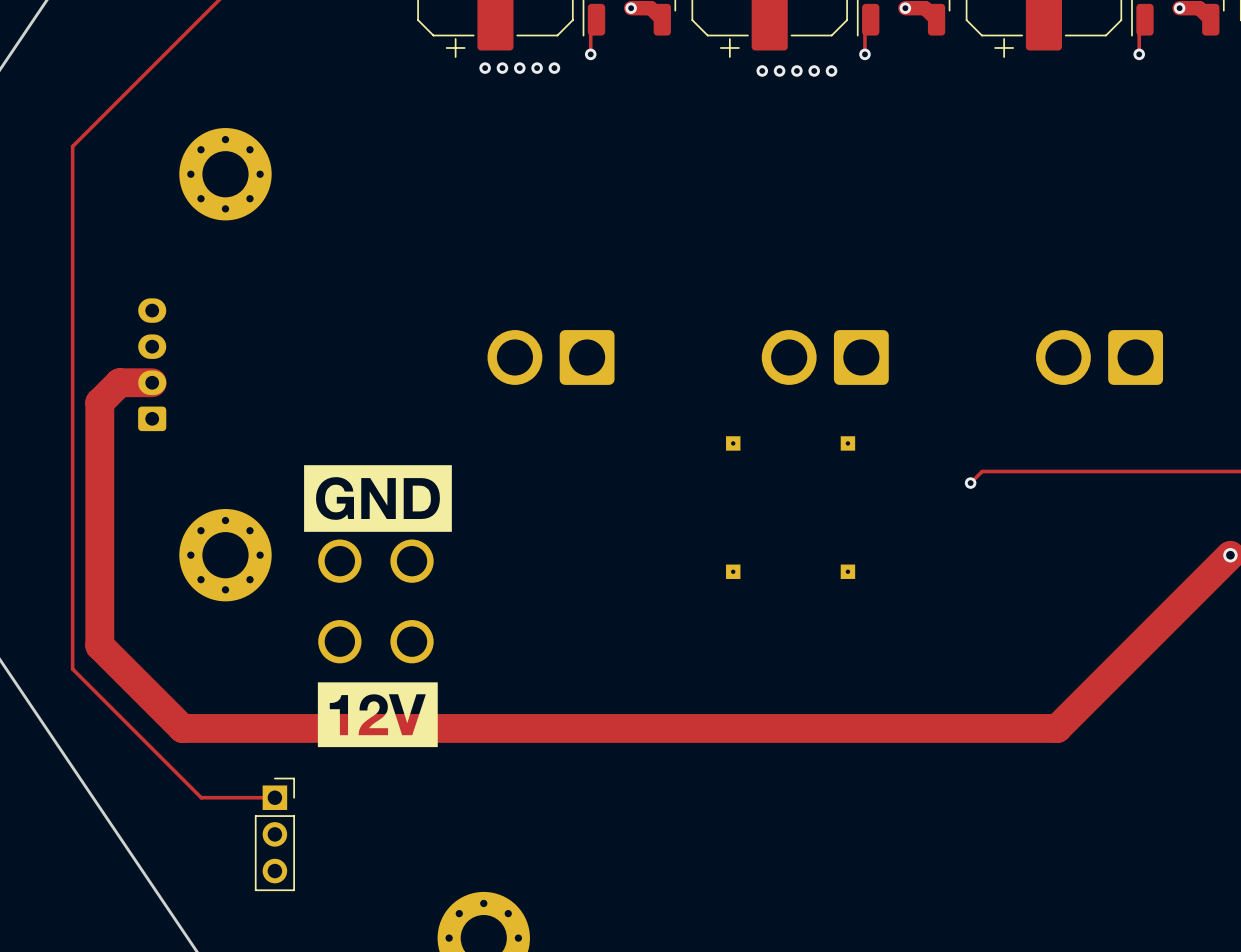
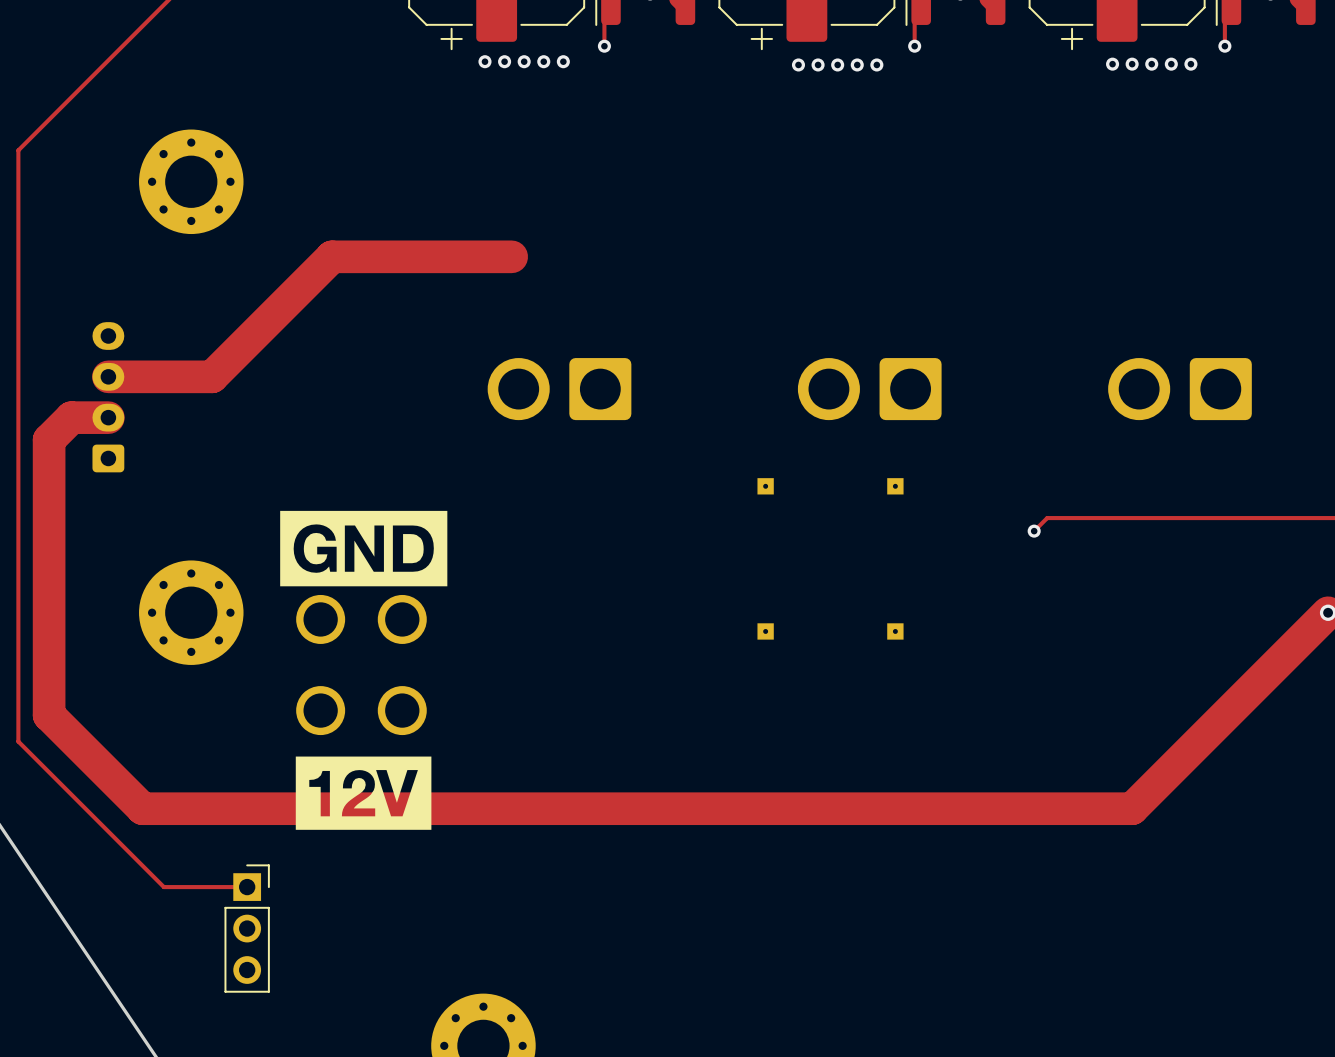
via: none -> (1112, 64)
via: none -> (1132, 64)
via: none -> (1151, 64)
via: none -> (1171, 64)
via: none -> (1190, 64)
track: none -> (511, 256) (332, 256) (212, 376) (108, 376)

